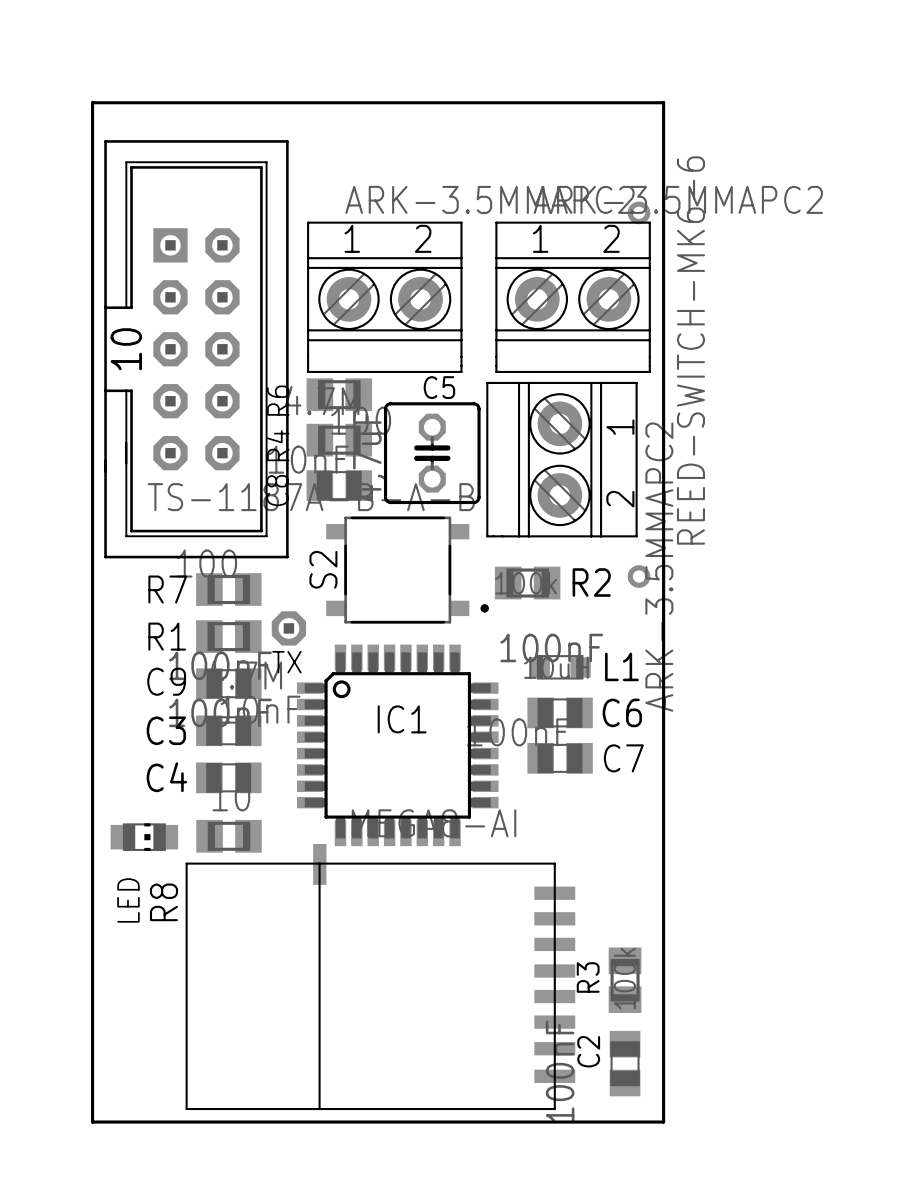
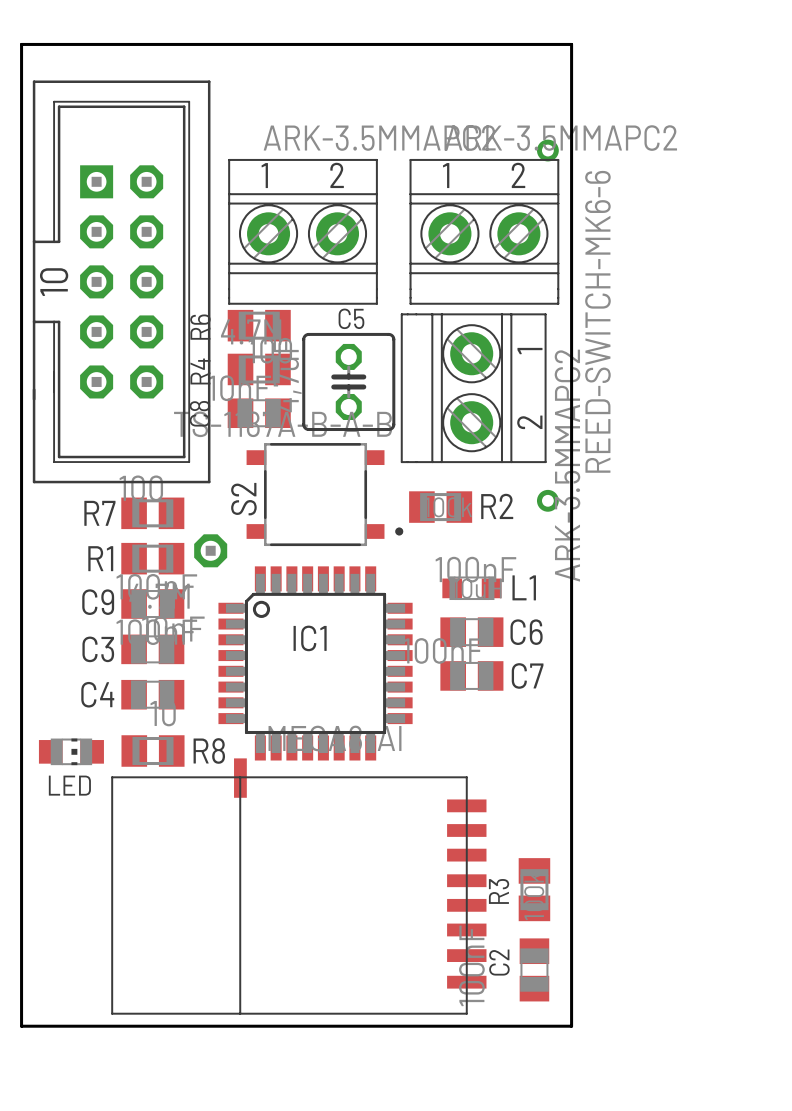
text: TX (286, 662) -> none
LED name rotation: 0° (128, 900) -> 90° clockwise (69, 785)
R8 name rotation: 0° (163, 902) -> 90° clockwise (209, 750)
R8 name position: R8 (163, 902) -> R8 (209, 750)

